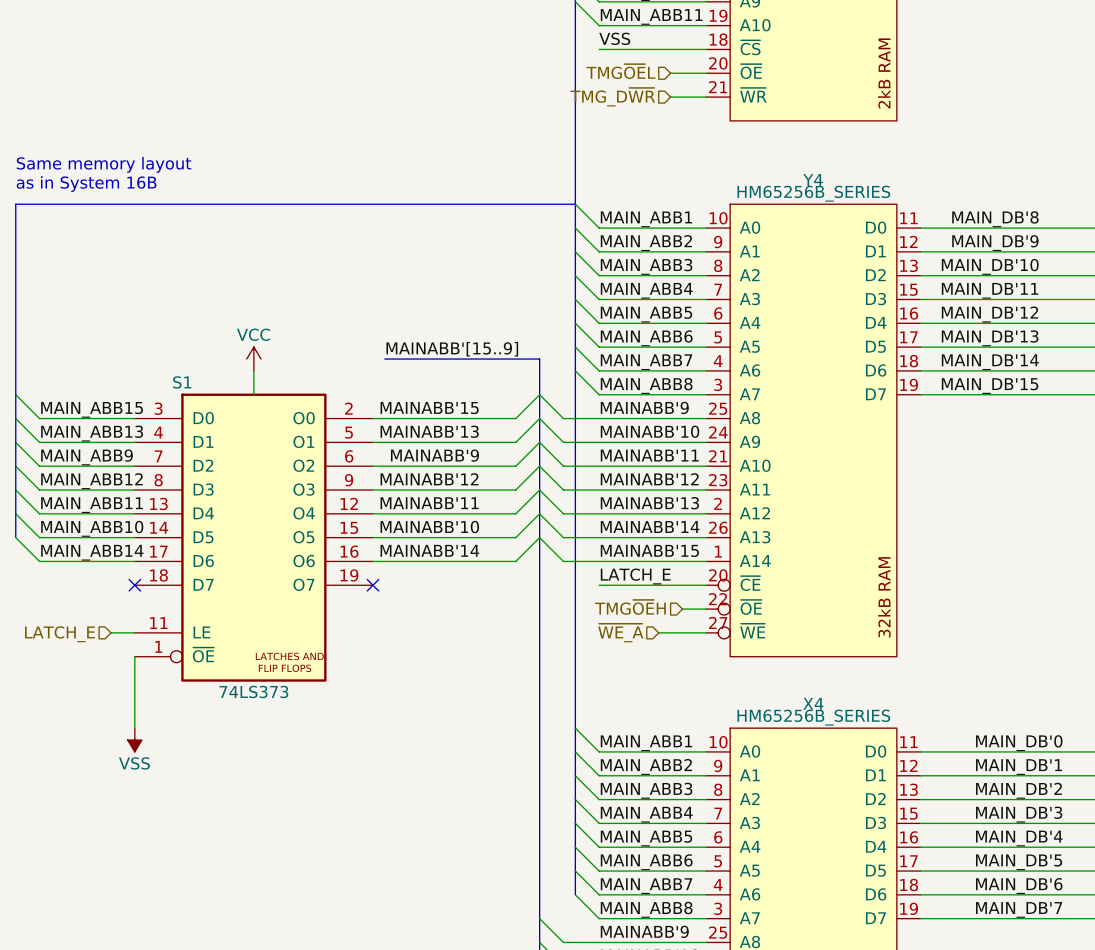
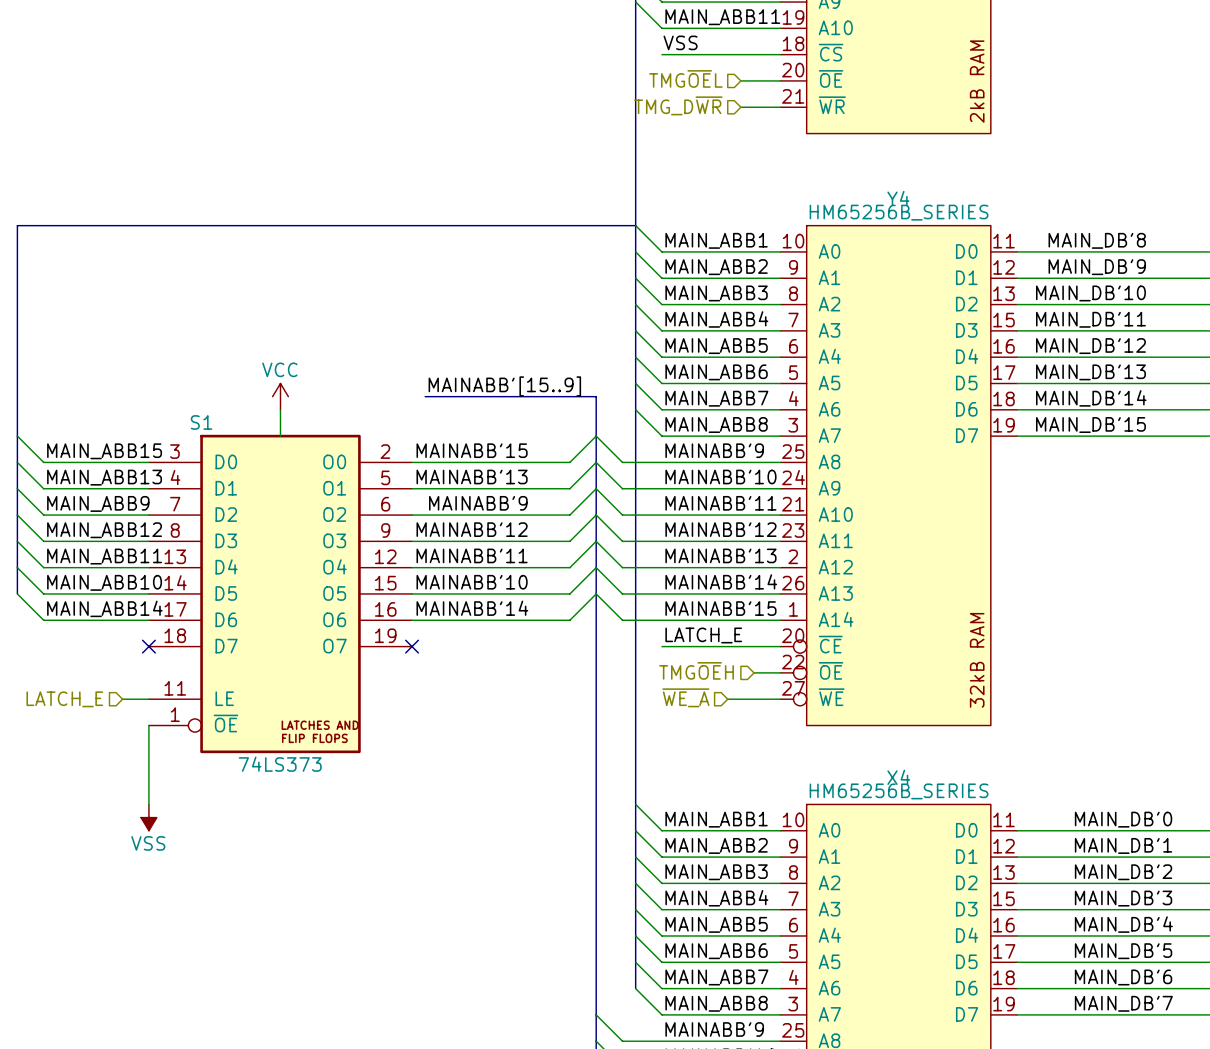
text: Same memory layout (104, 164) -> none
text: as in System 16B (86, 184) -> none

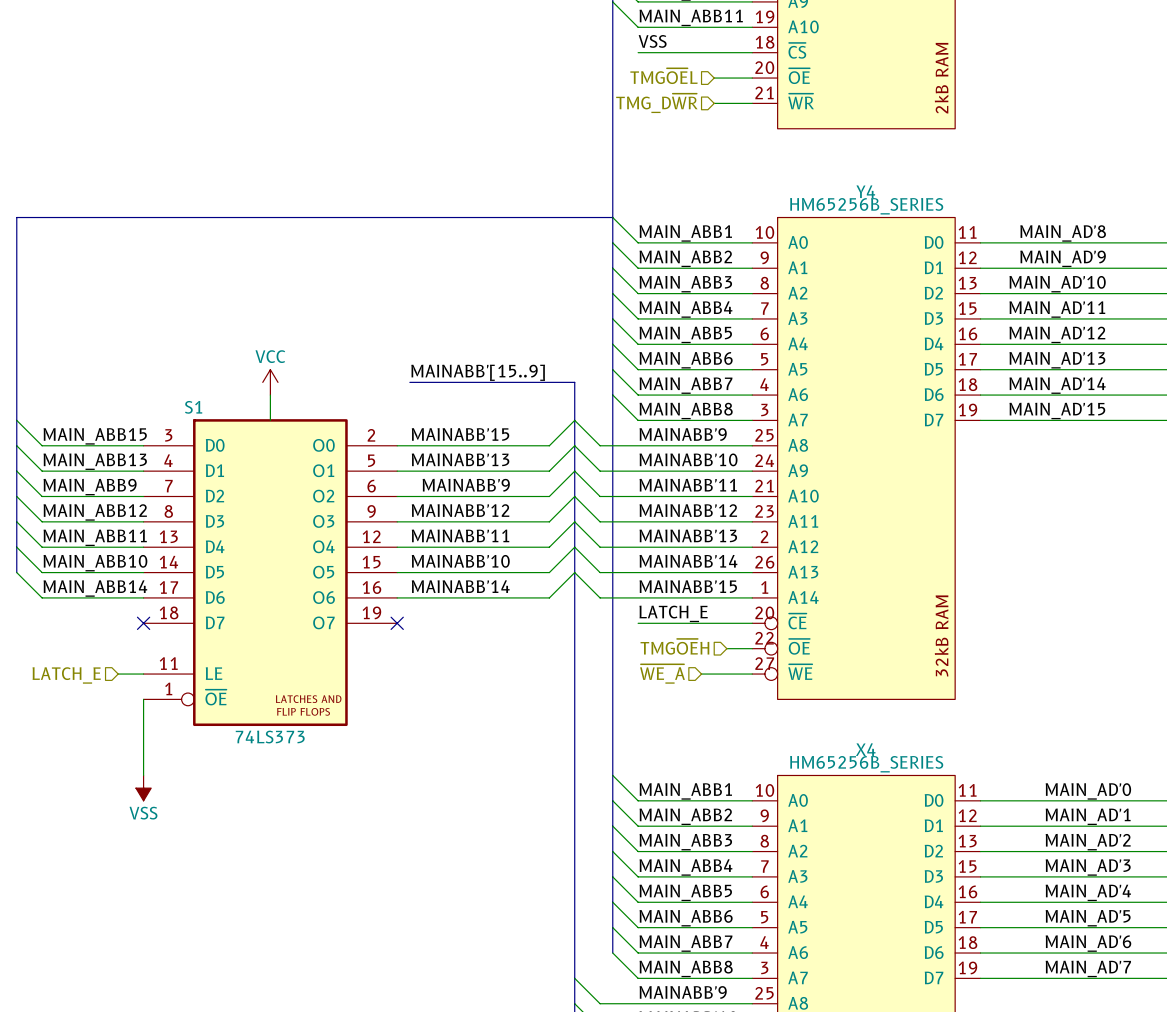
label: MAIN_DB'8 (1097, 240) -> MAIN_AD'8 (1063, 233)
label: MAIN_DB'9 (1097, 267) -> MAIN_AD'9 (1063, 258)
label: MAIN_DB'10 (1090, 293) -> MAIN_AD'10 (1057, 284)
label: MAIN_DB'11 (1090, 319) -> MAIN_AD'11 (1057, 309)
label: MAIN_DB'12 (1090, 346) -> MAIN_AD'12 (1057, 334)
label: MAIN_DB'13 (1090, 372) -> MAIN_AD'13 (1057, 360)
label: MAIN_DB'14 (1091, 398) -> MAIN_AD'14 (1057, 385)
label: MAIN_DB'15 (1090, 425) -> MAIN_AD'15 (1057, 410)
label: MAIN_DB'0 (1123, 819) -> MAIN_AD'0 (1088, 791)
label: MAIN_DB'1 (1123, 845) -> MAIN_AD'1 (1088, 816)
label: MAIN_DB'2 (1123, 872) -> MAIN_AD'2 (1088, 842)
label: MAIN_DB'3 (1123, 898) -> MAIN_AD'3 (1088, 867)
label: MAIN_DB'4 (1123, 924) -> MAIN_AD'4 (1088, 892)
label: MAIN_DB'5 (1123, 951) -> MAIN_AD'5 (1088, 918)
label: MAIN_DB'6 (1123, 977) -> MAIN_AD'6 (1088, 943)
label: MAIN_DB'7 (1123, 1003) -> MAIN_AD'7 (1088, 968)

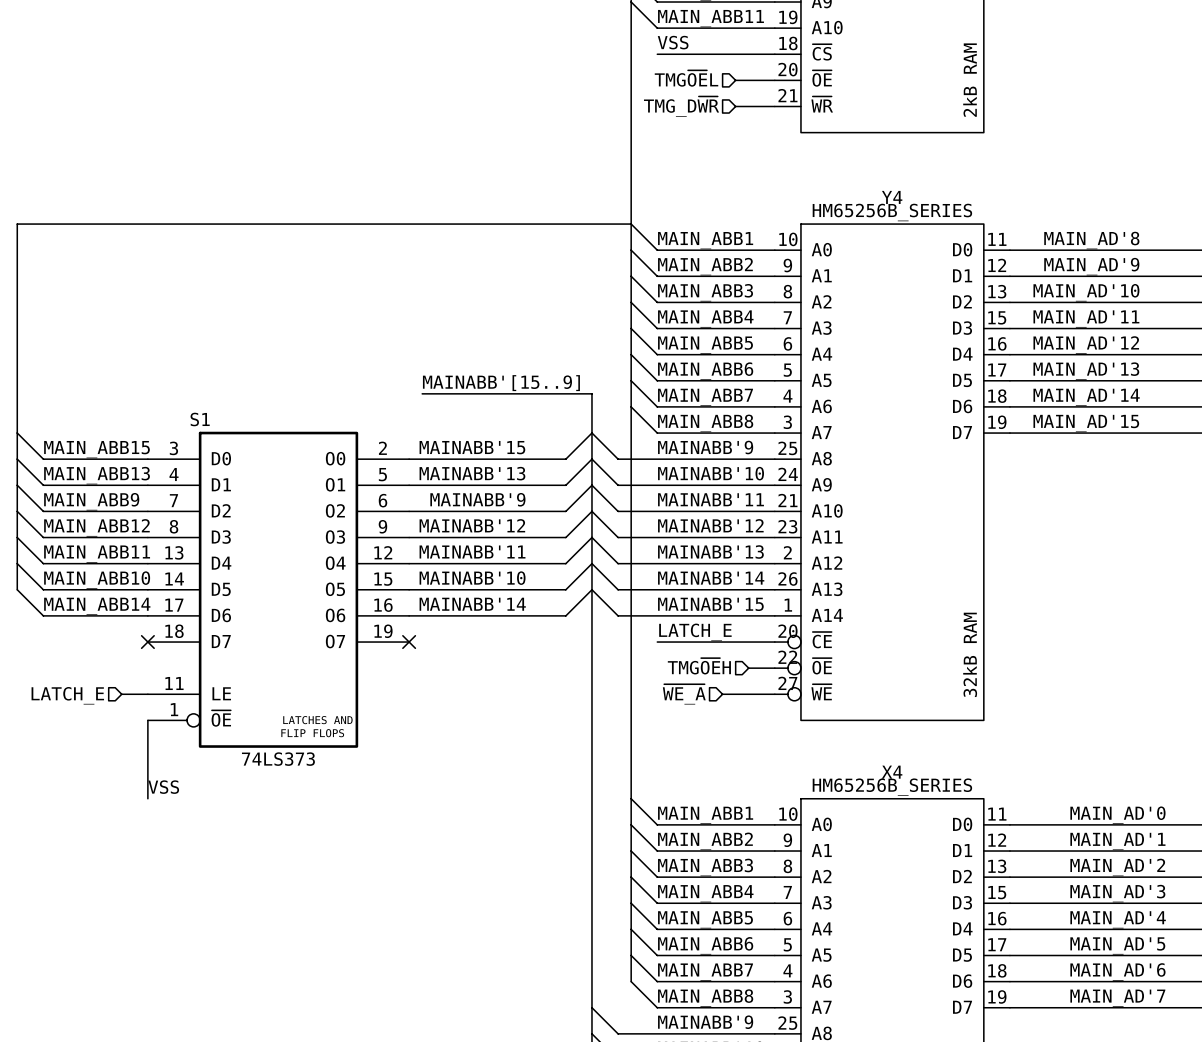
power symbol: VCC (270, 382) -> none
wire: (270, 395) (270, 420) -> none
label: none -> VSS (163, 787)
power symbol: VSS (143, 788) -> none

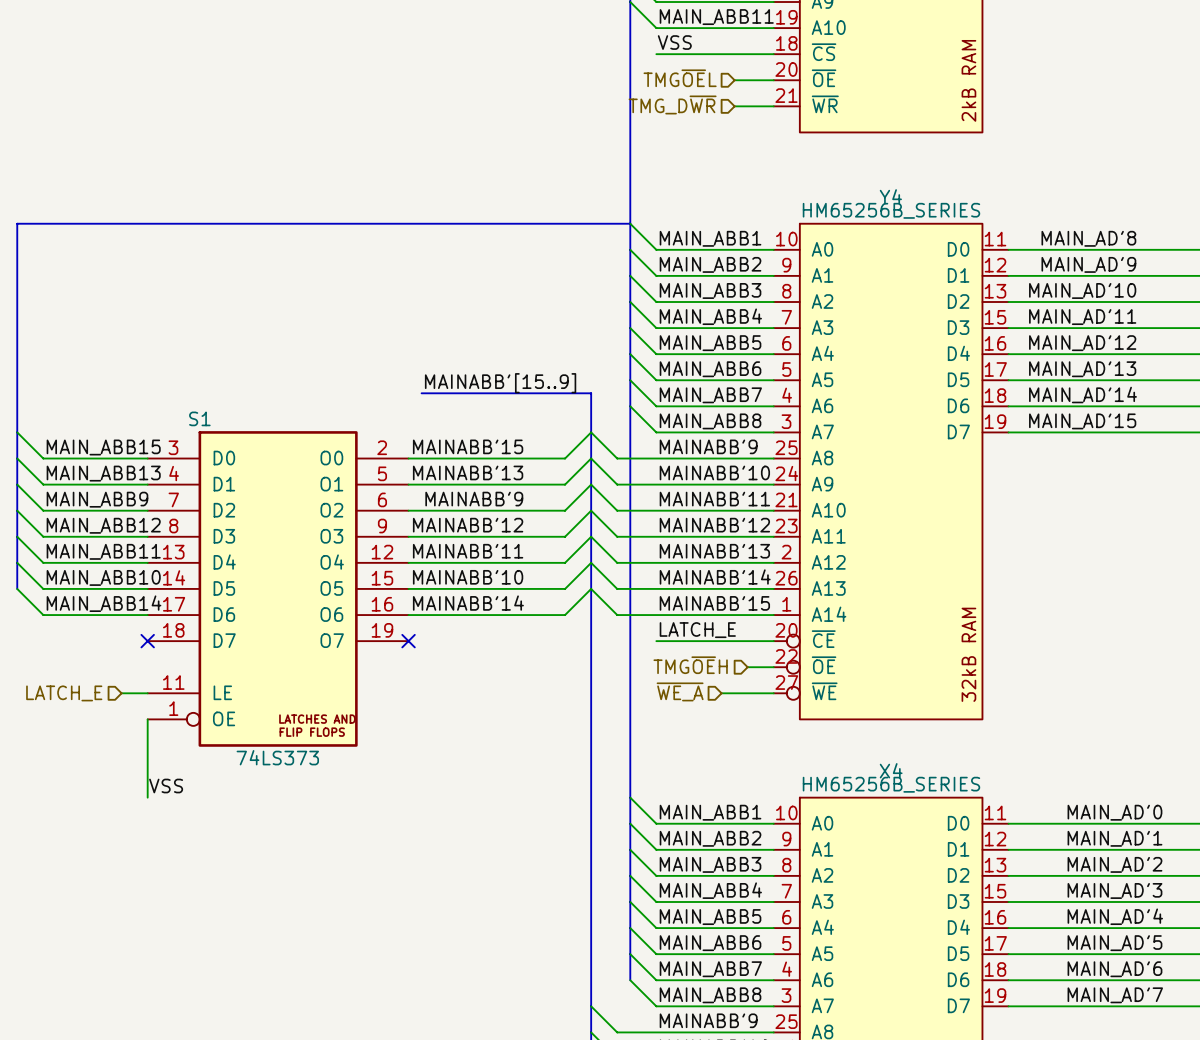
S1 pin name: ~{OE} (221, 718) -> OE (224, 718)

